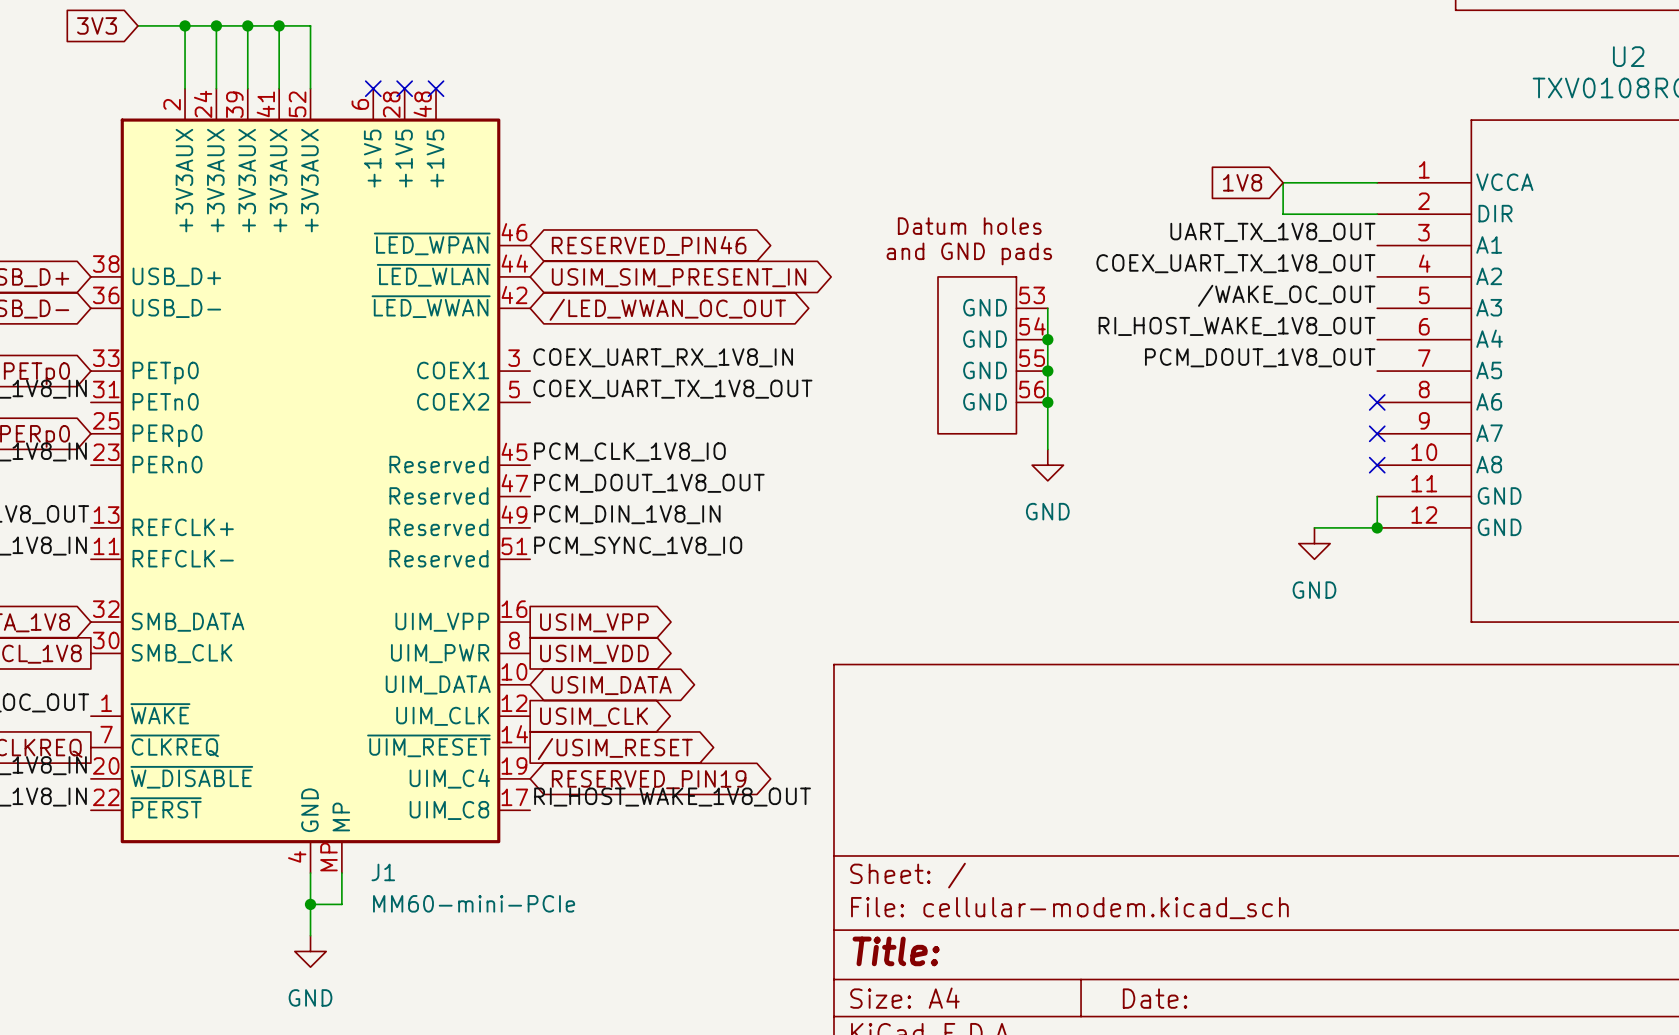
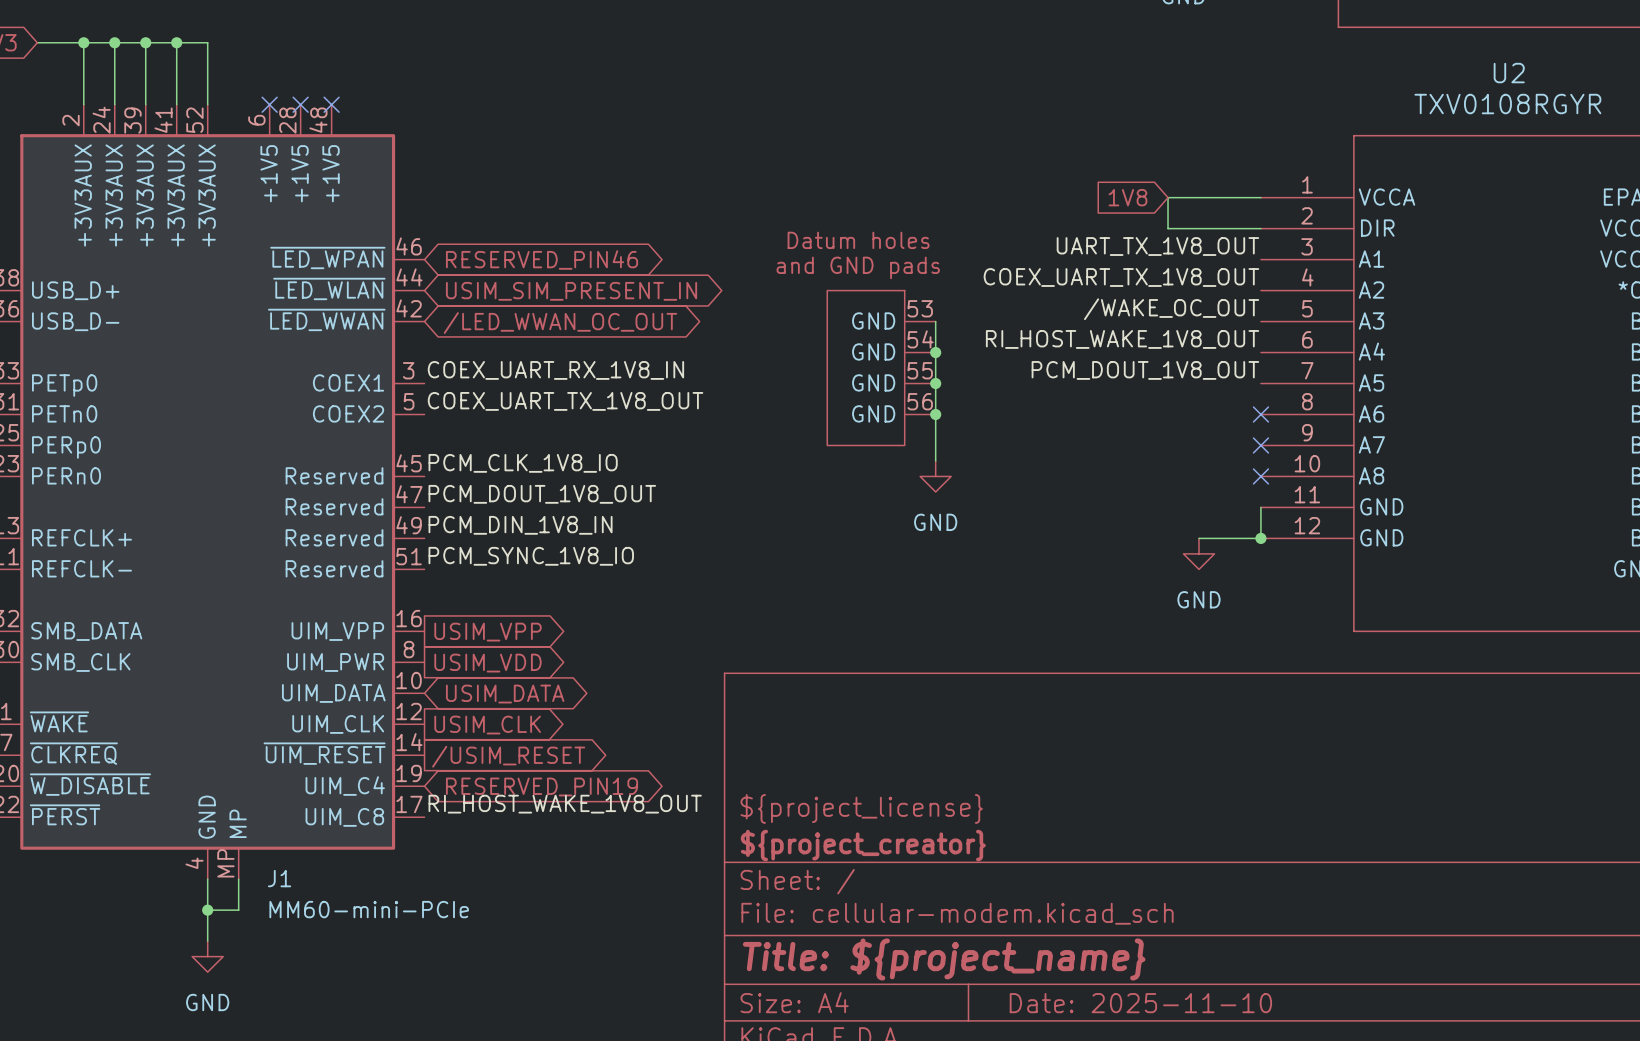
title block: none -> ${project_license} (861, 808)
title block: none -> ${project_creator} (863, 845)
title block: Title: (896, 951) -> Title: ${project_name} (944, 959)
title block: Date: (1155, 998) -> Date: 2025-11-10 (1140, 1003)

